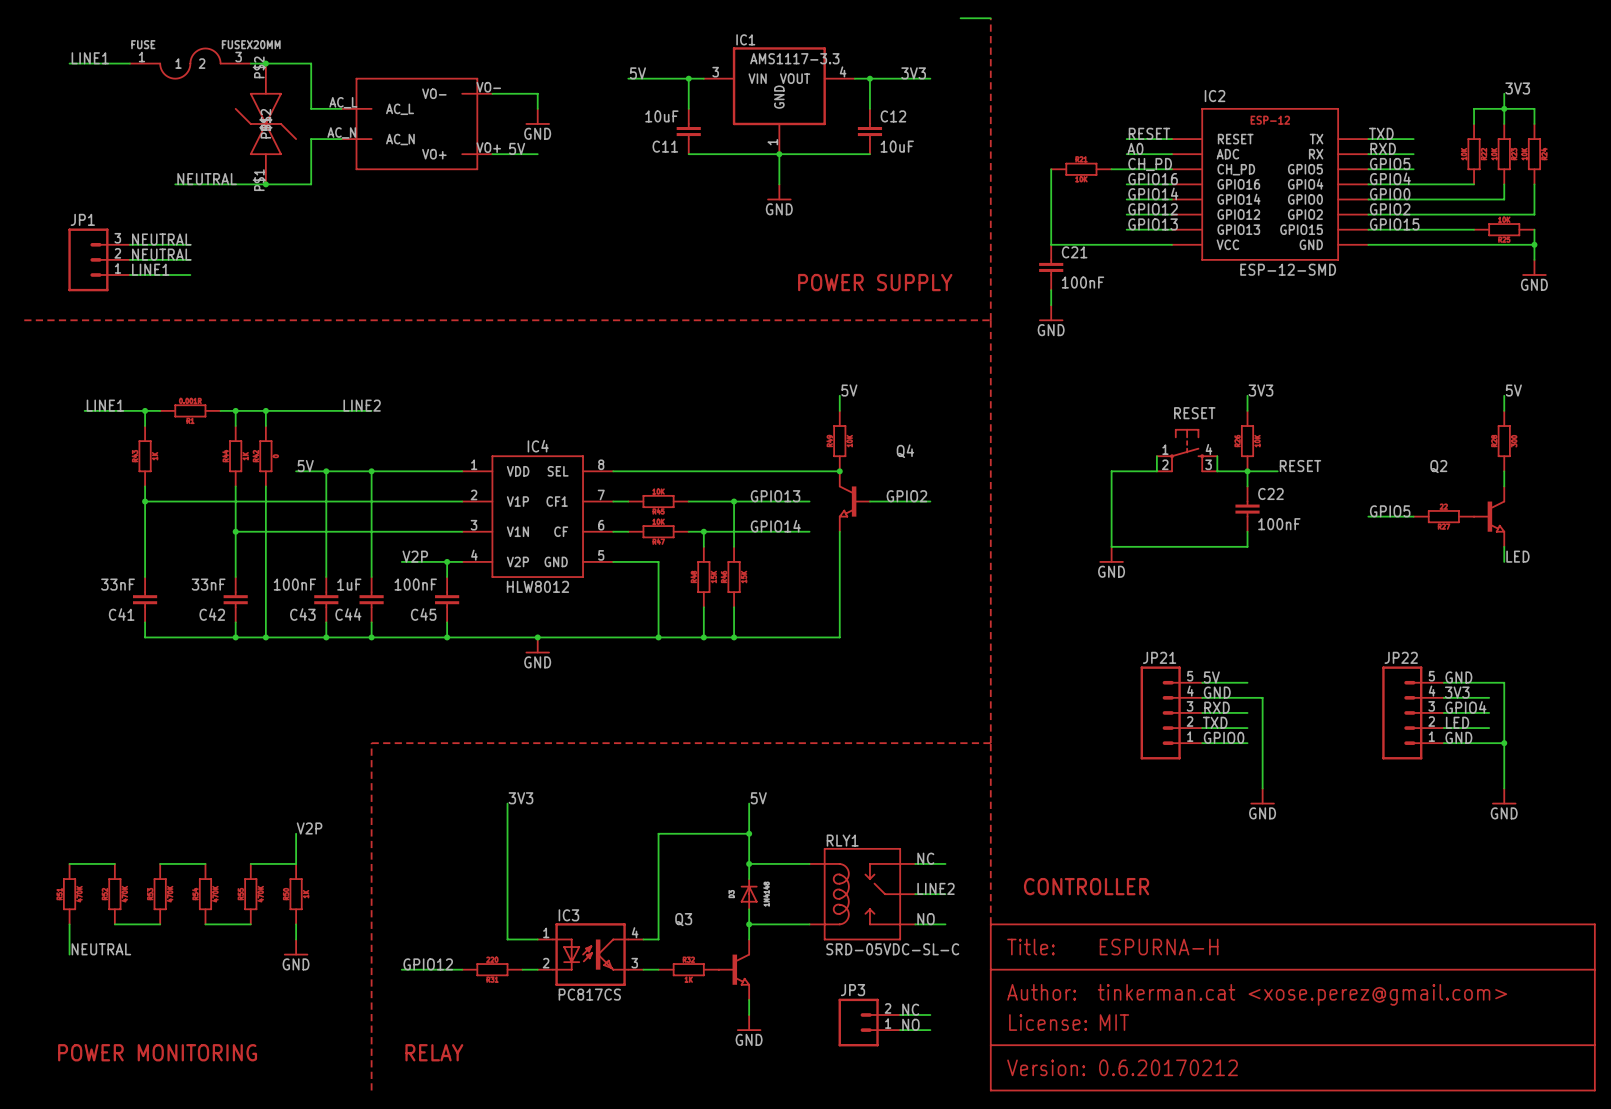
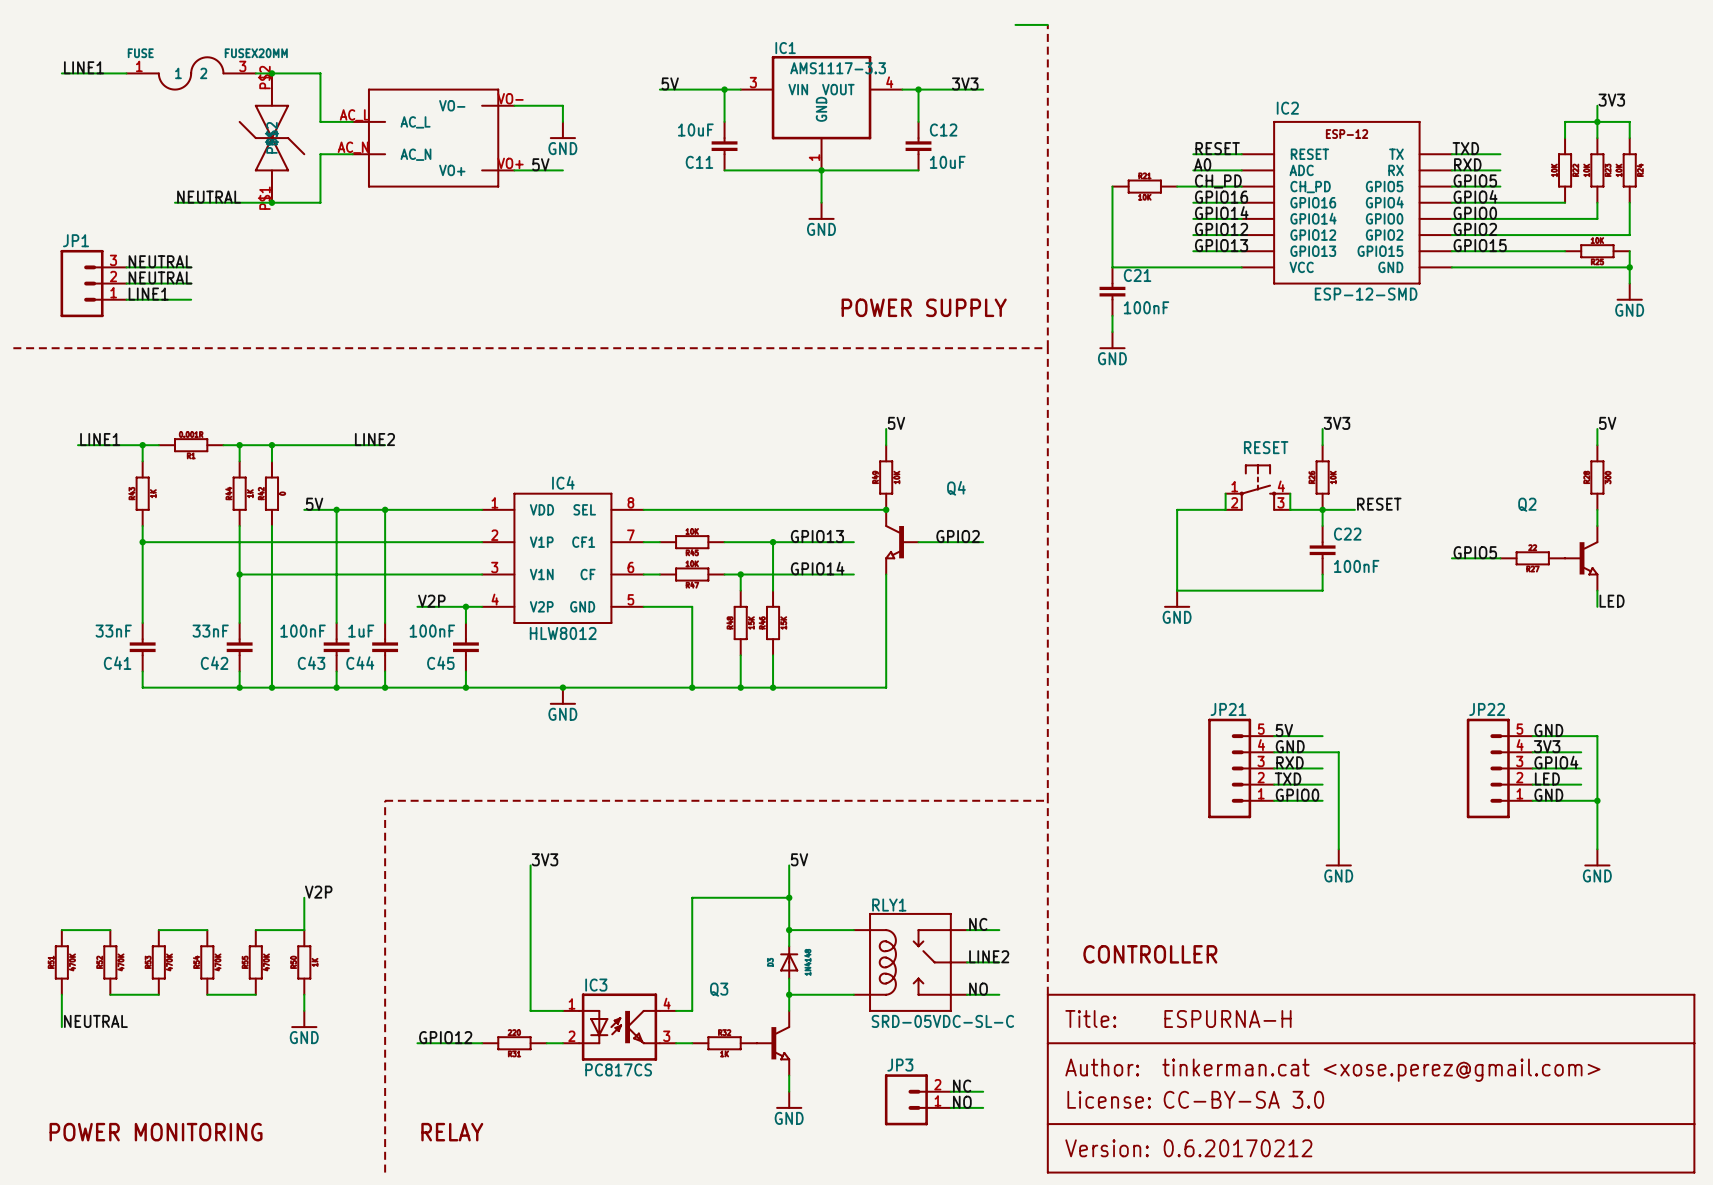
part text: MIT (1114, 1022) -> CC-BY-SA 3.0 (1243, 1099)

